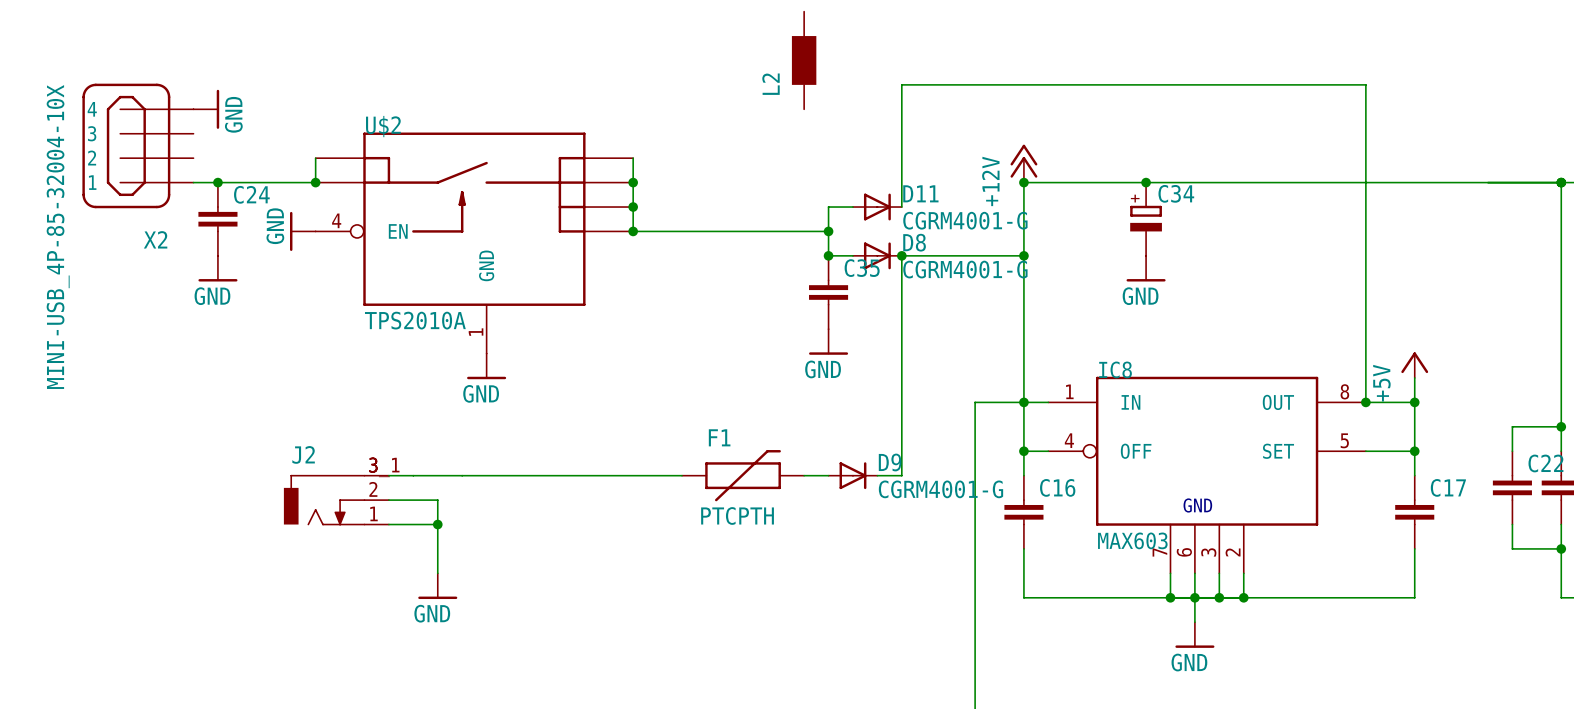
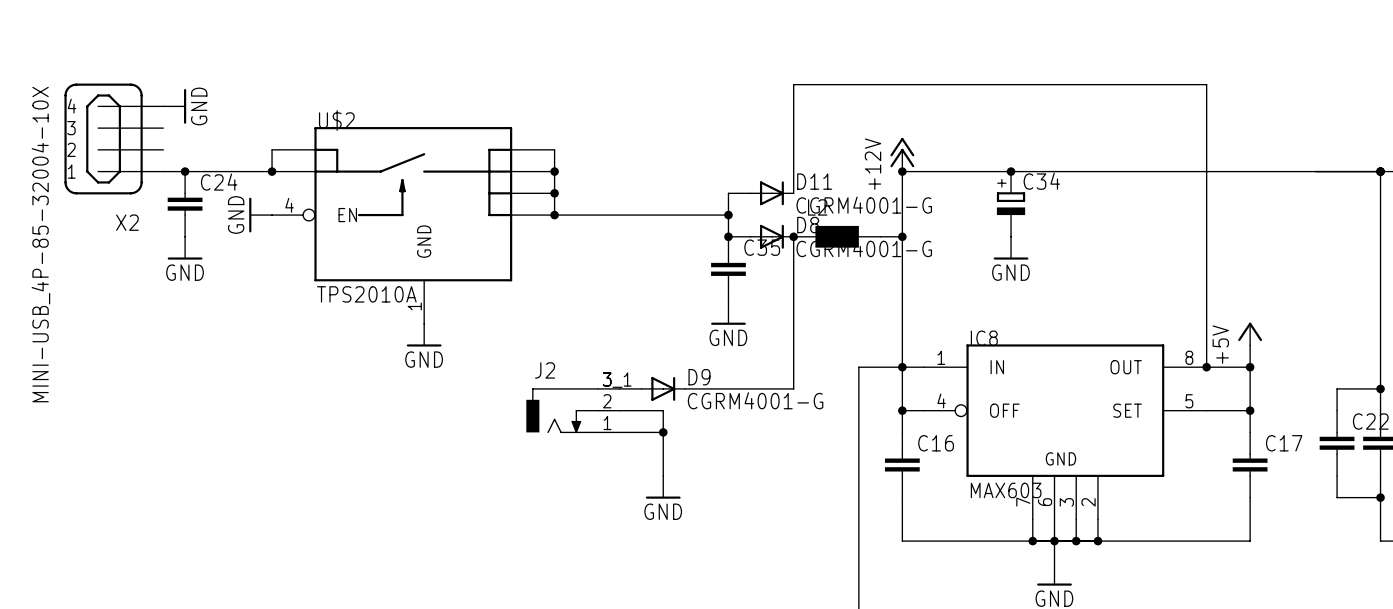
L2 rotation: 0° (804, 60) -> 90° clockwise (837, 236)
L2 position: (804, 60) -> (837, 236)
wire: (901, 426) (901, 475) (877, 475) -> (793, 388) (685, 388)
wire: none -> (619, 410) (663, 410) (663, 475)
wire: (388, 475) (682, 475) -> none
wire: none -> (619, 432) (663, 432)
F1: PTCPTH (743, 475) -> none
junction: none -> (663, 432)
wire: (804, 475) (828, 475) -> (619, 388) (641, 388)
D9 position: (852, 475) -> (663, 388)
J2 position: (336, 500) -> (573, 410)
wire: (388, 500) (437, 500) (437, 573) -> none
wire: (388, 524) (437, 524) -> none
junction: (437, 524) -> none
power symbol: none -> GND (663, 487)
power symbol: GND (437, 586) -> none

